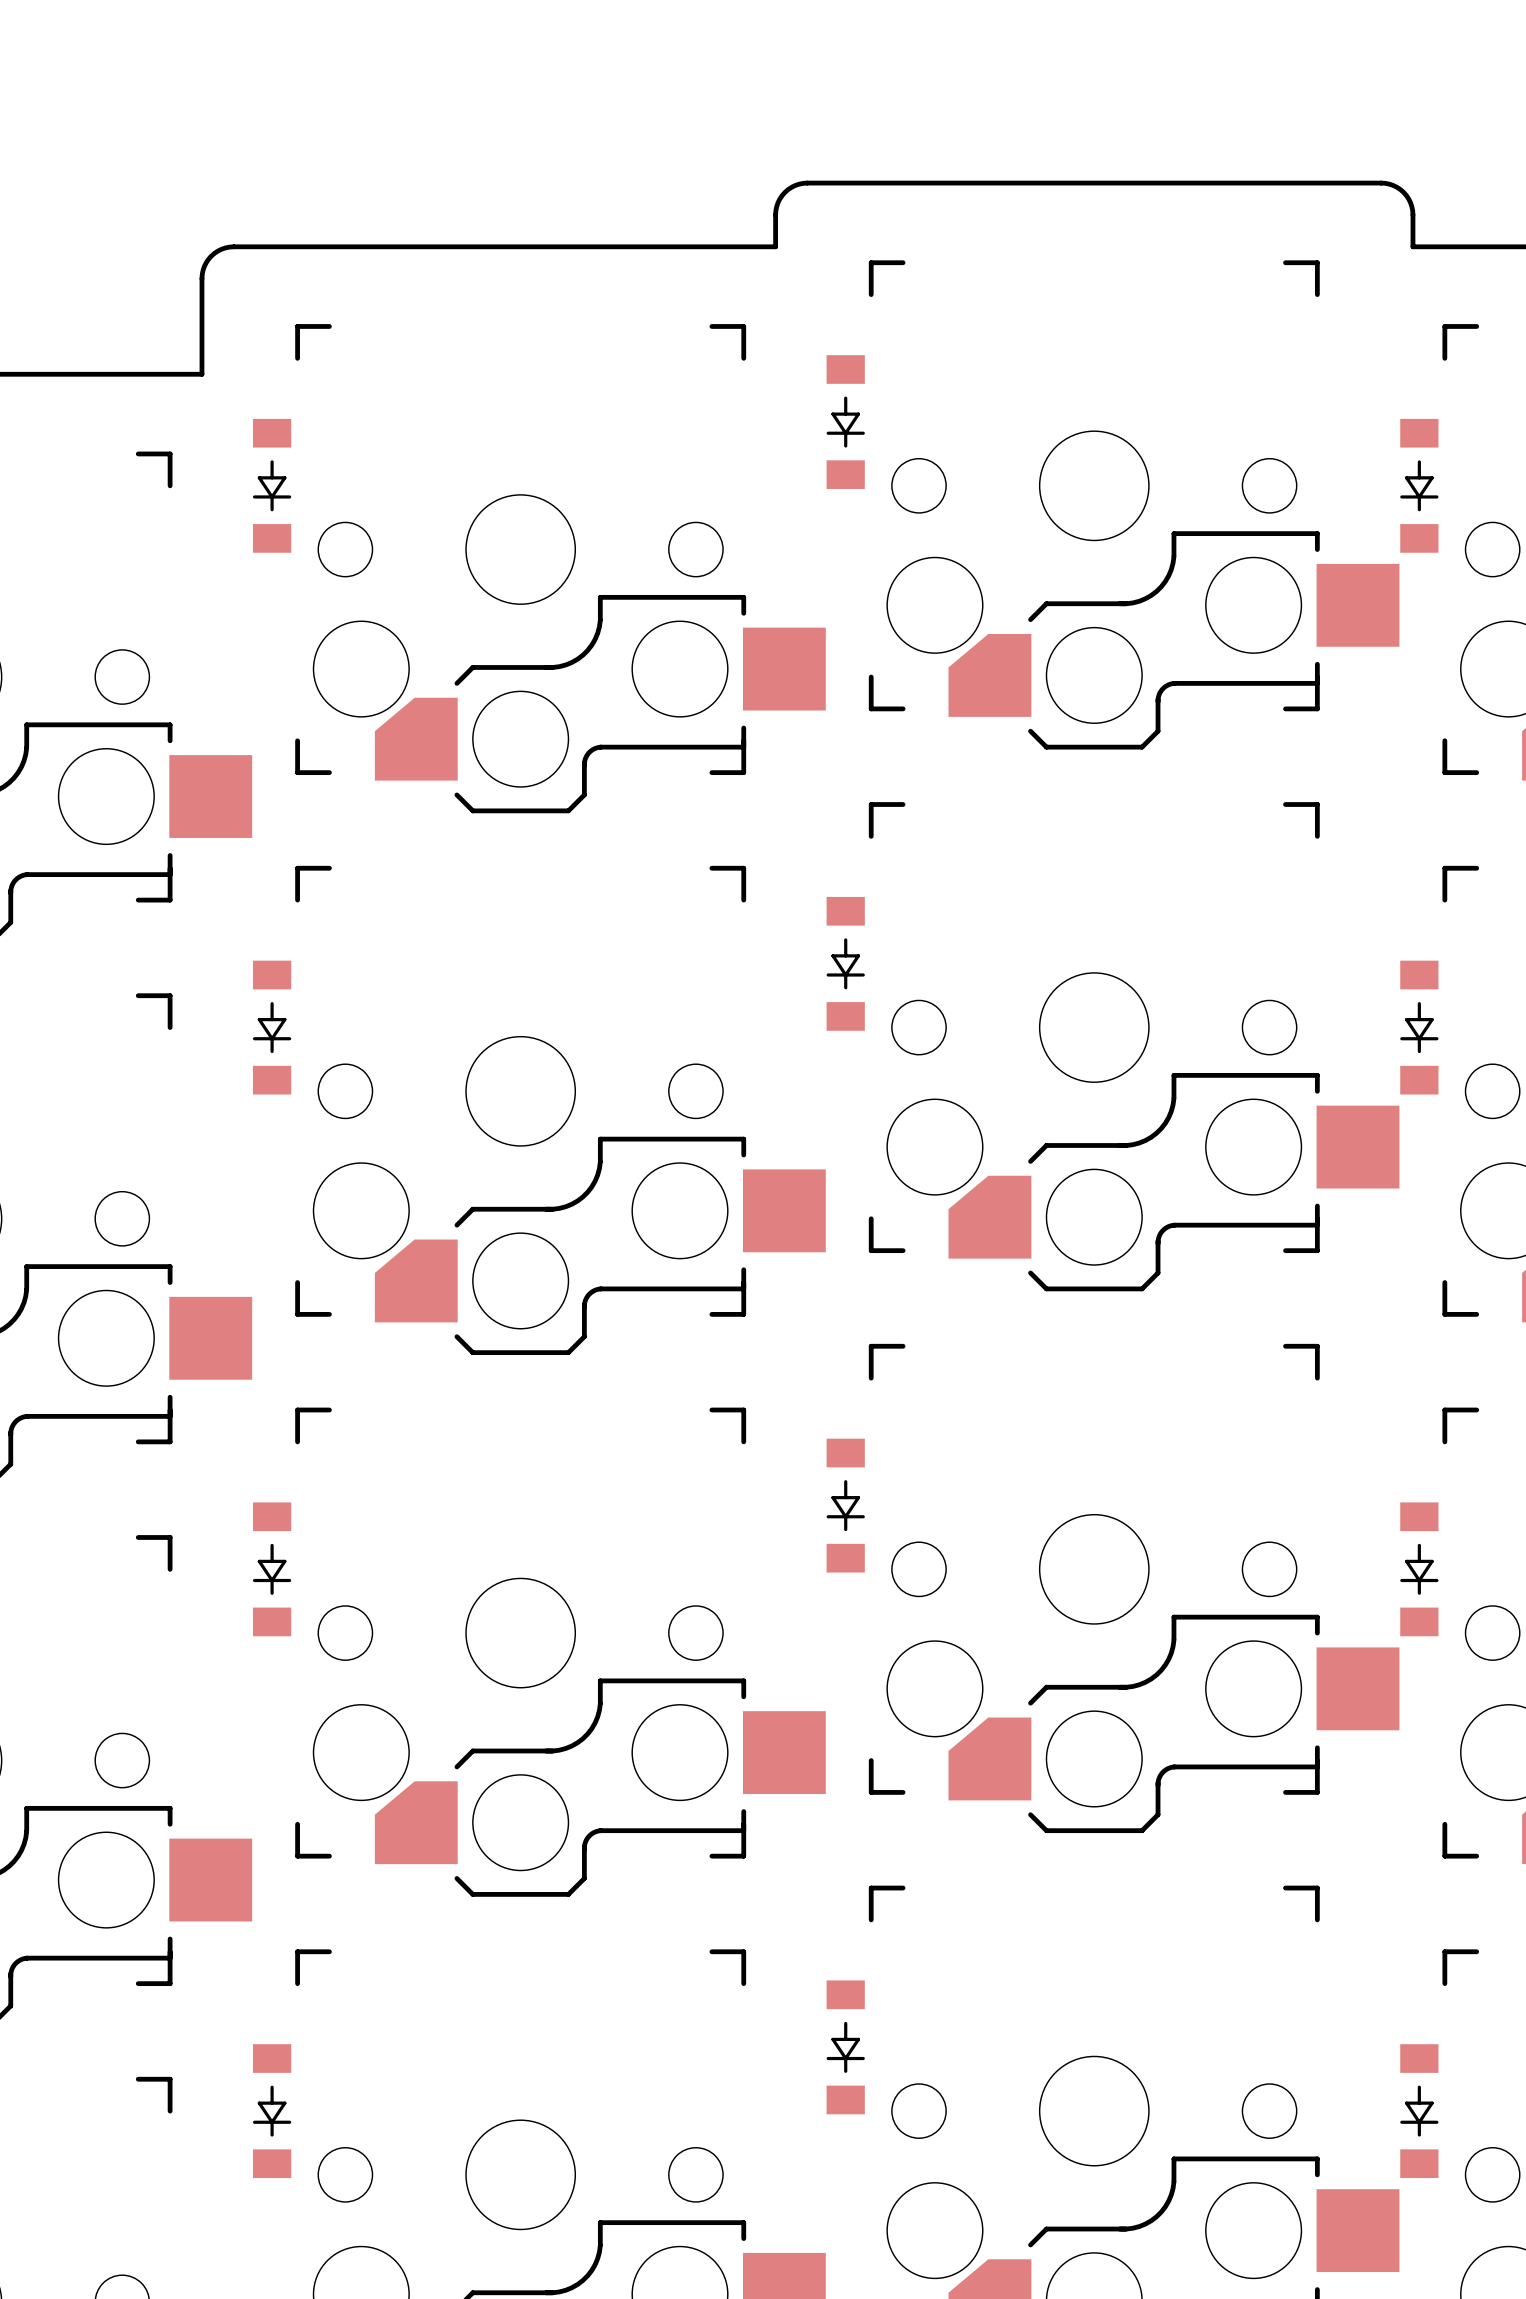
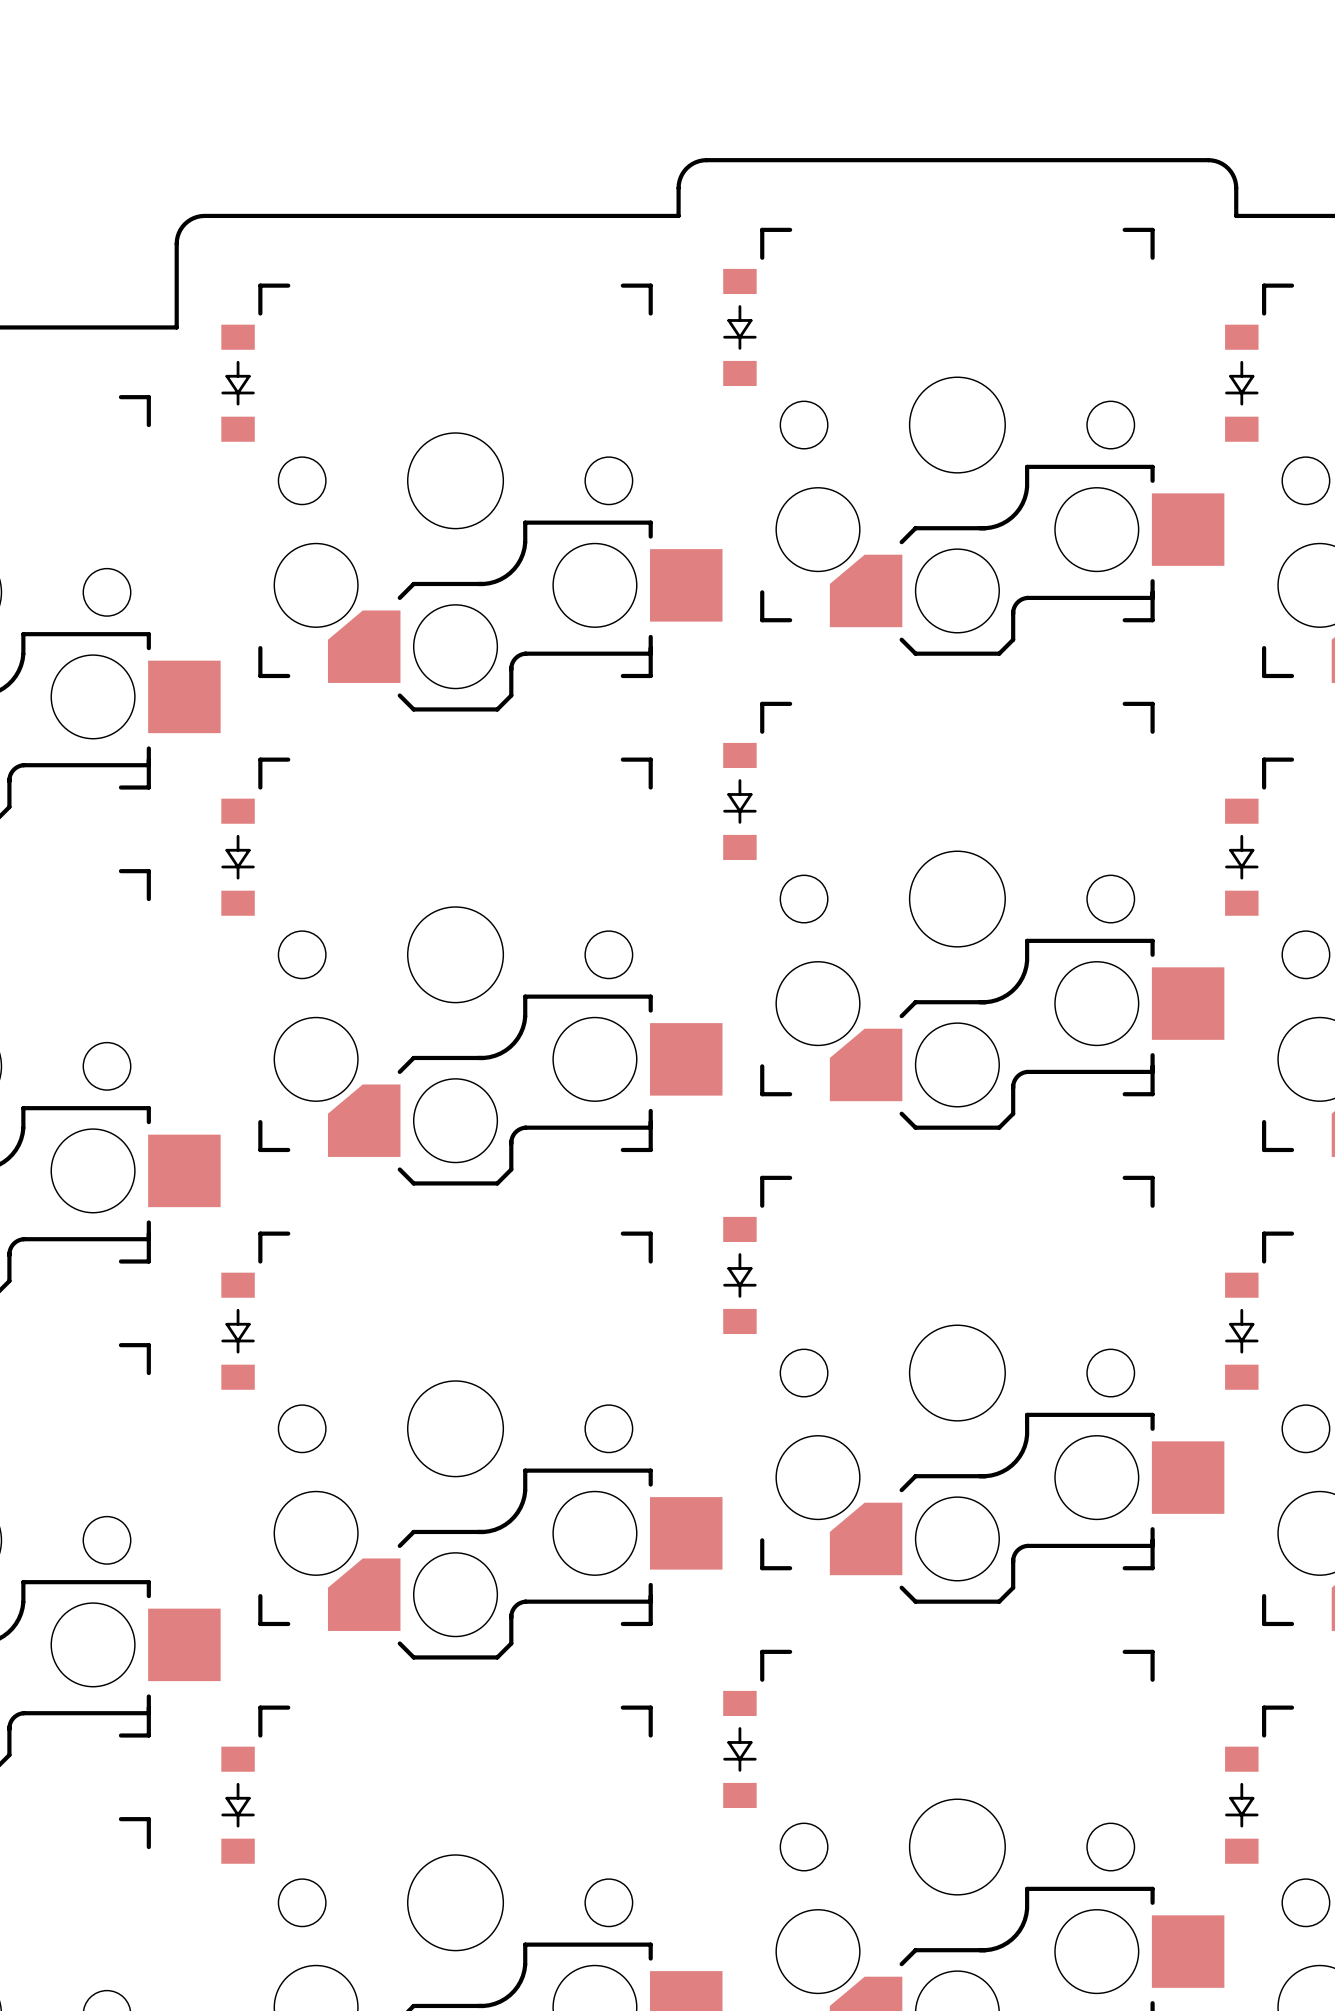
part position: (845, 422) -> (739, 327)
part position: (272, 485) -> (238, 383)
part position: (1419, 485) -> (1241, 383)
part position: (845, 963) -> (739, 801)
part position: (272, 1027) -> (238, 857)
part position: (1419, 1027) -> (1241, 857)
part position: (845, 1505) -> (739, 1275)
part position: (272, 1569) -> (238, 1331)
part position: (1419, 1569) -> (1241, 1331)
part position: (845, 2047) -> (739, 1749)
part position: (272, 2111) -> (238, 1805)
part position: (1419, 2111) -> (1241, 1805)

